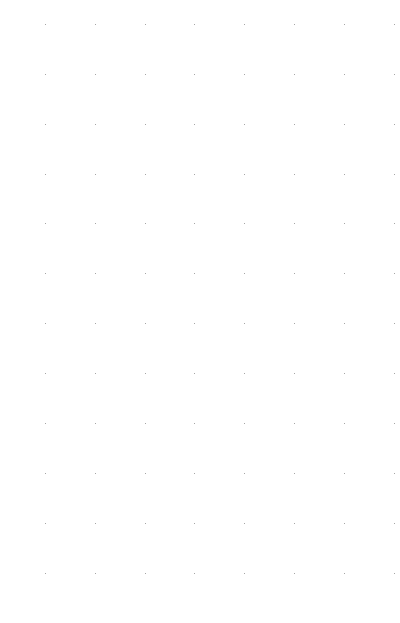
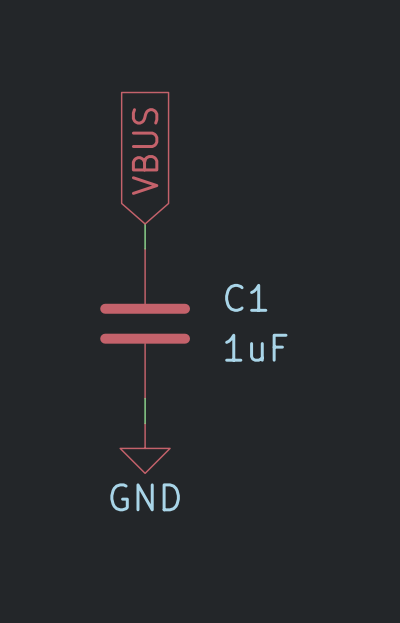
global label: none -> VBUS (145, 151)
wire: none -> (145, 223) (145, 248)
C1: none -> 1uF (145, 323)
wire: none -> (145, 398) (145, 423)
power symbol: none -> GND (145, 448)

